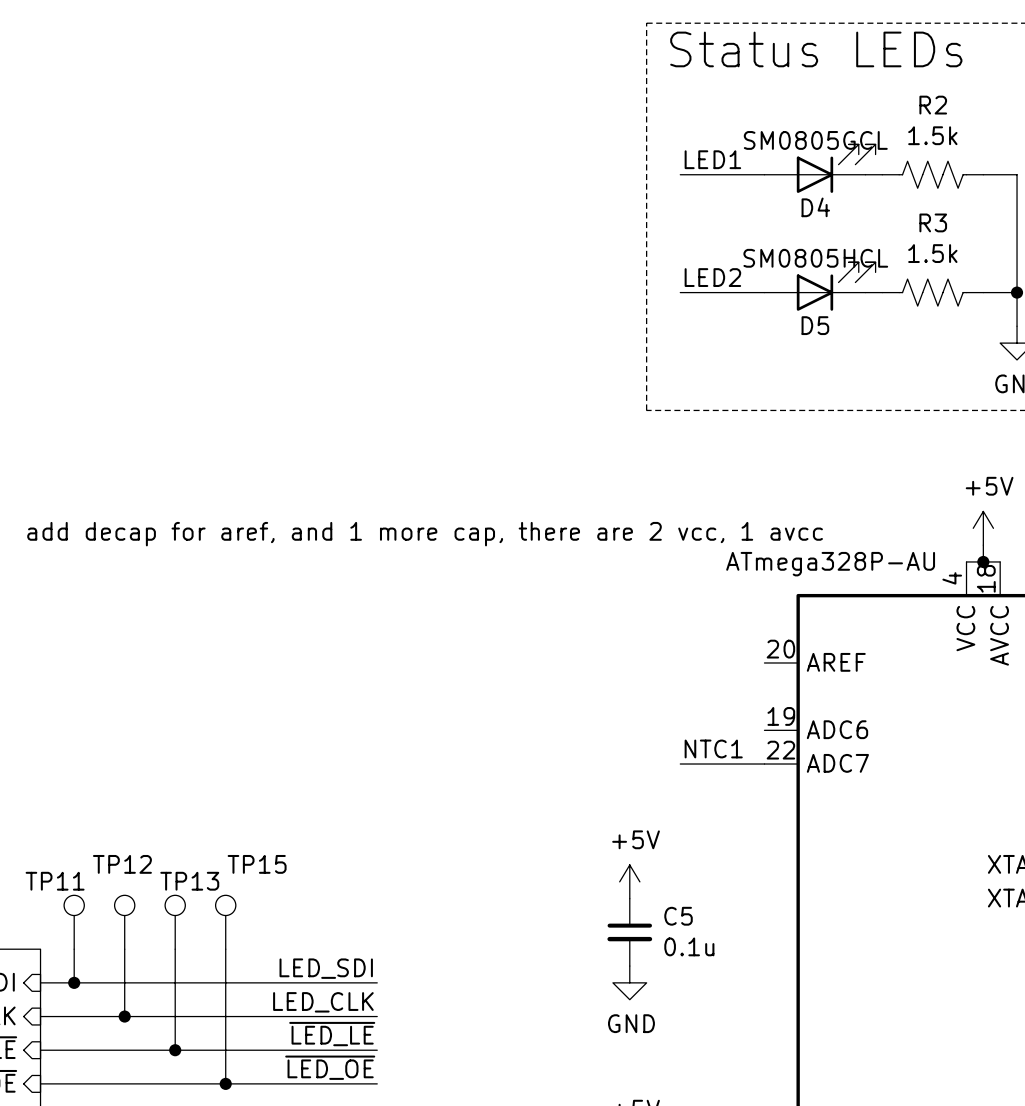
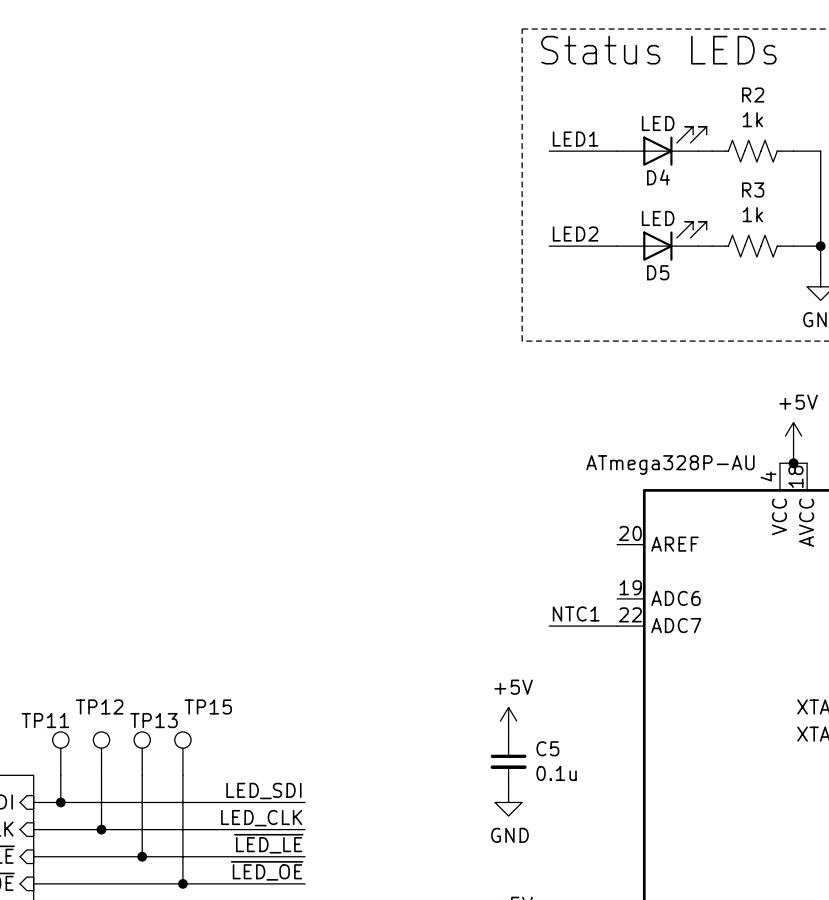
R2 value: 1.5k (932, 135) -> 1k (752, 119)
D4 value: SM0805GCL (815, 140) -> LED (658, 123)
R3 value: 1.5k (932, 253) -> 1k (752, 214)
D5 value: SM0805HCL (815, 258) -> LED (658, 218)
text: add decap for aref, and 1 more cap, there are 2 vcc, 1 avcc (425, 534) -> none

